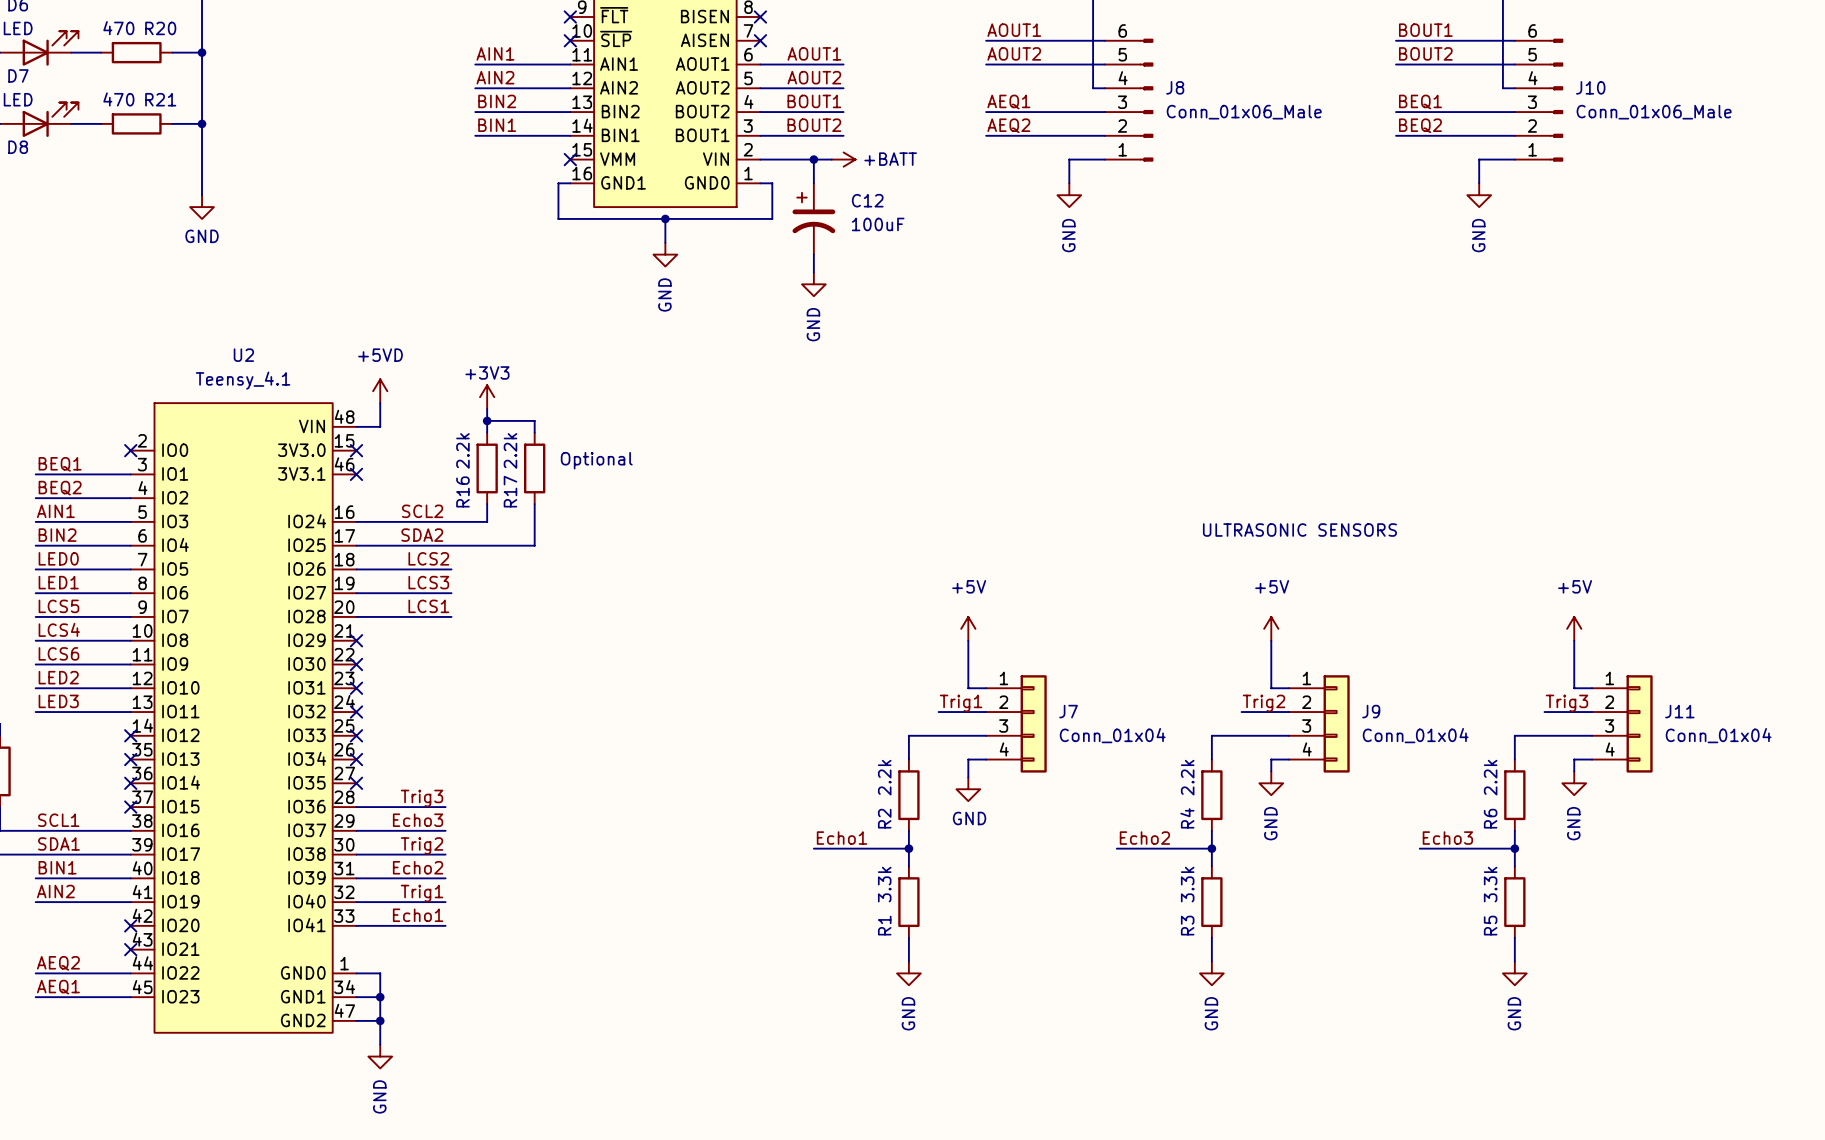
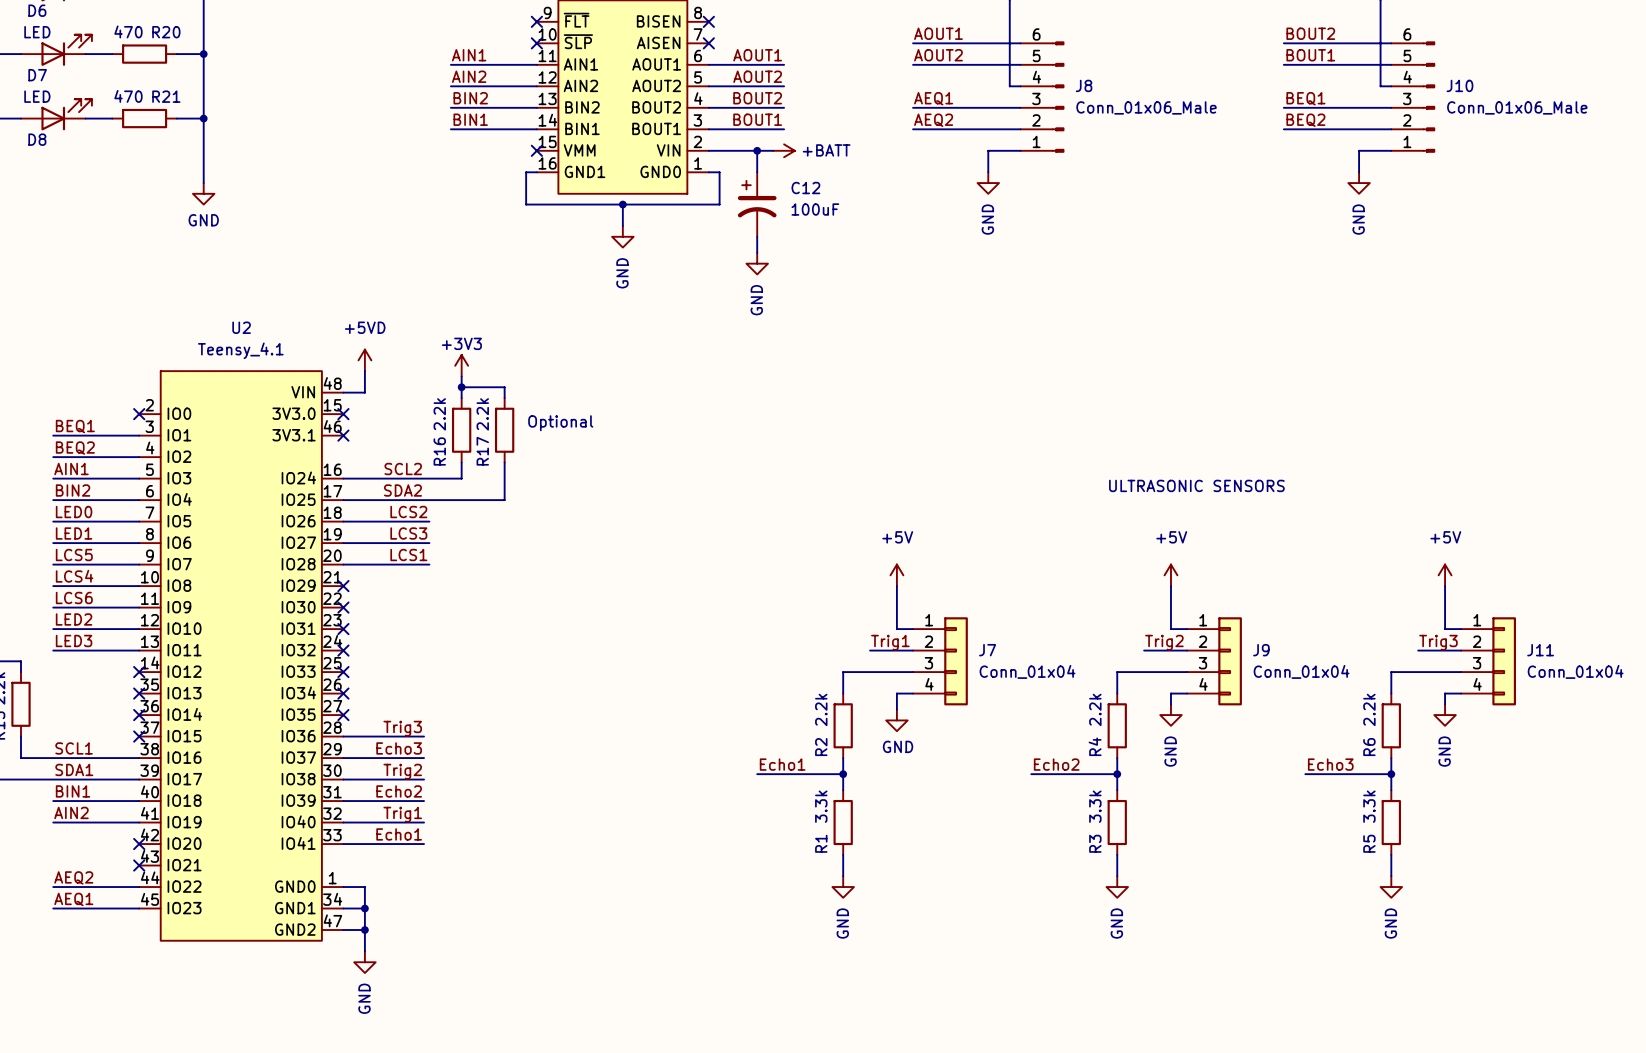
label: BOUT1 (1425, 30) -> BOUT2 (1310, 33)
label: BOUT2 (1425, 53) -> BOUT1 (1310, 55)
label: BOUT1 (814, 101) -> BOUT2 (757, 98)
label: BOUT2 (814, 125) -> BOUT1 (757, 119)

